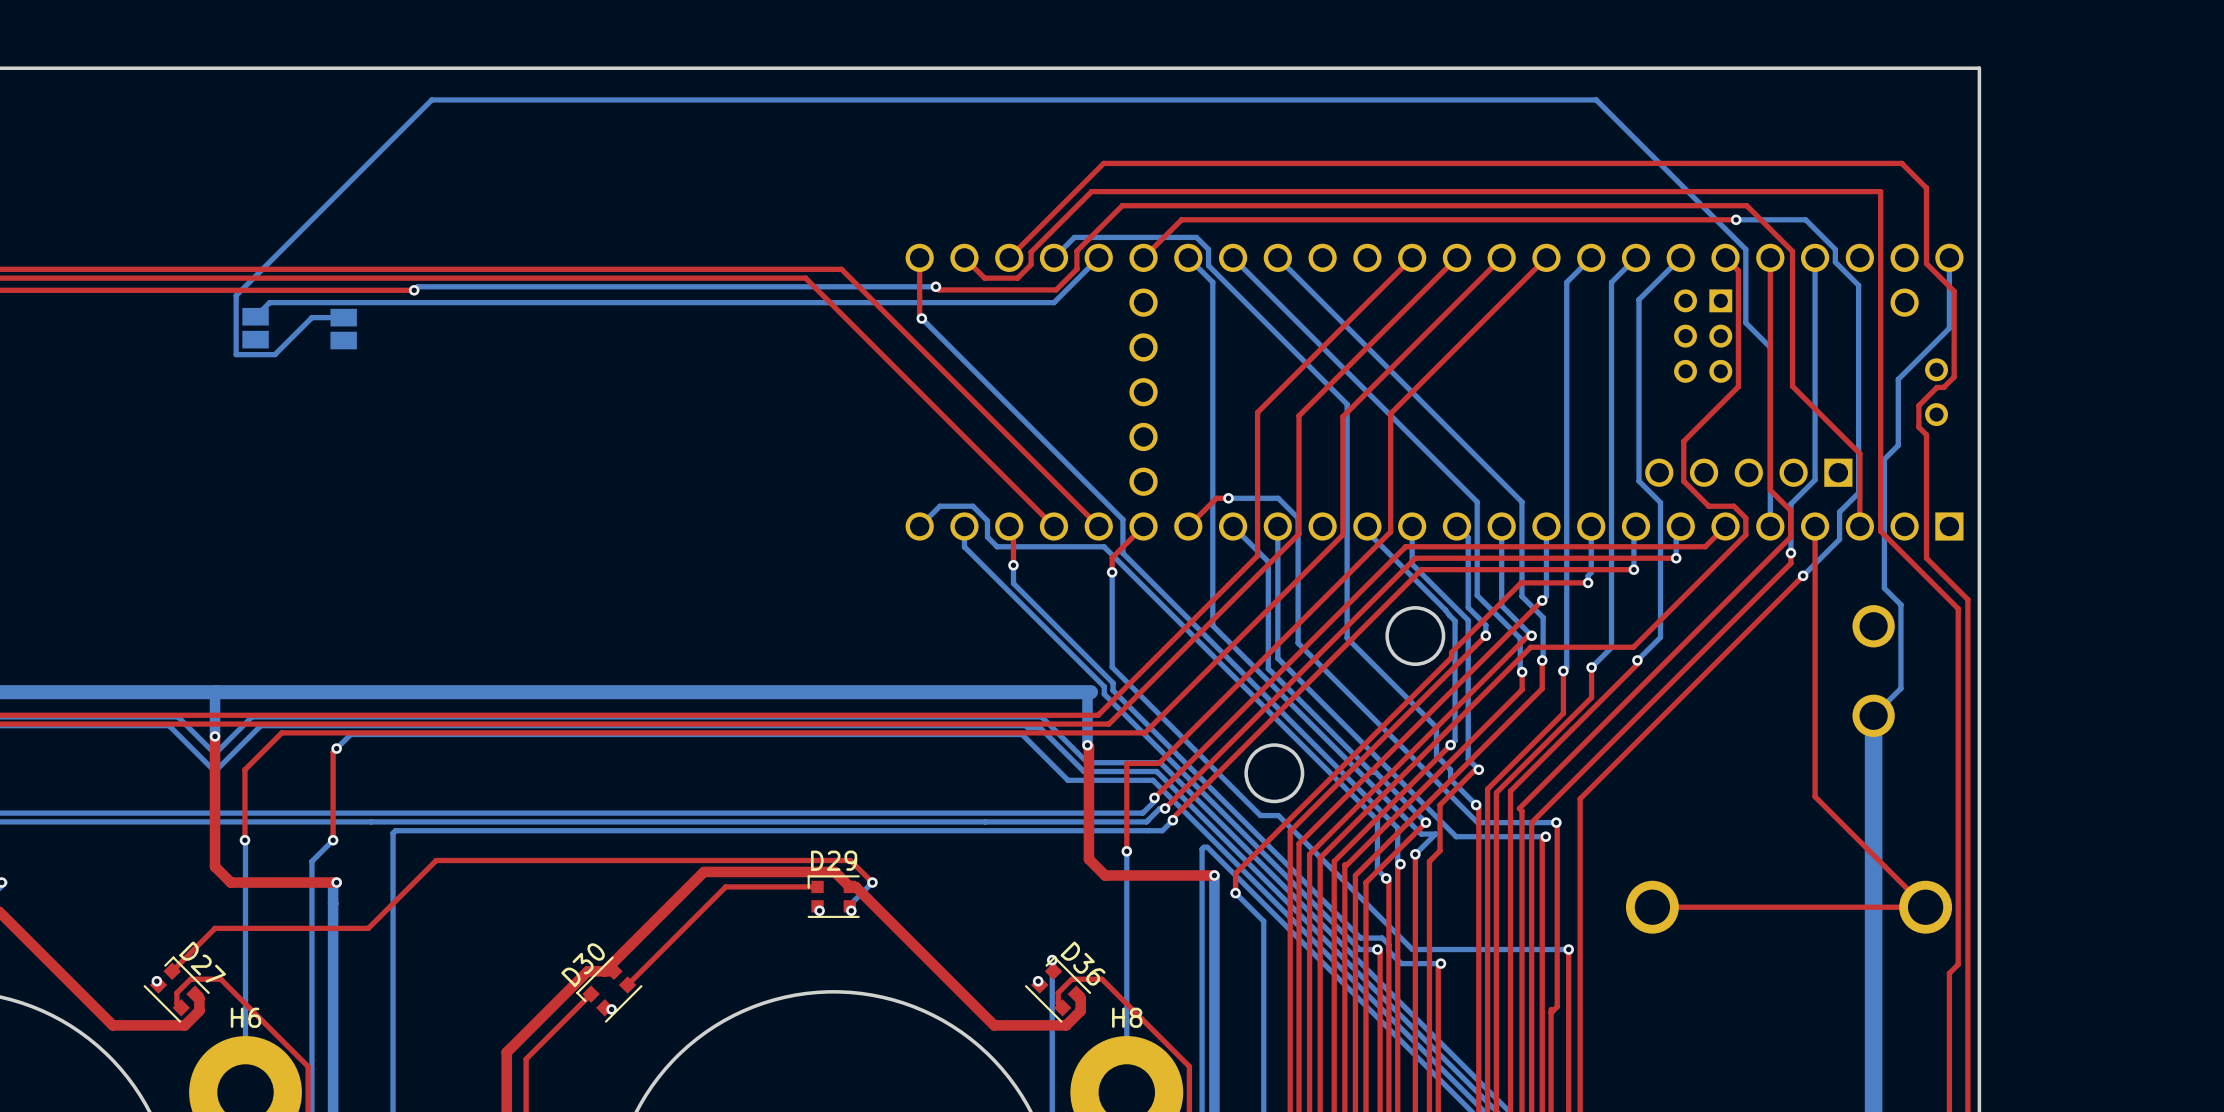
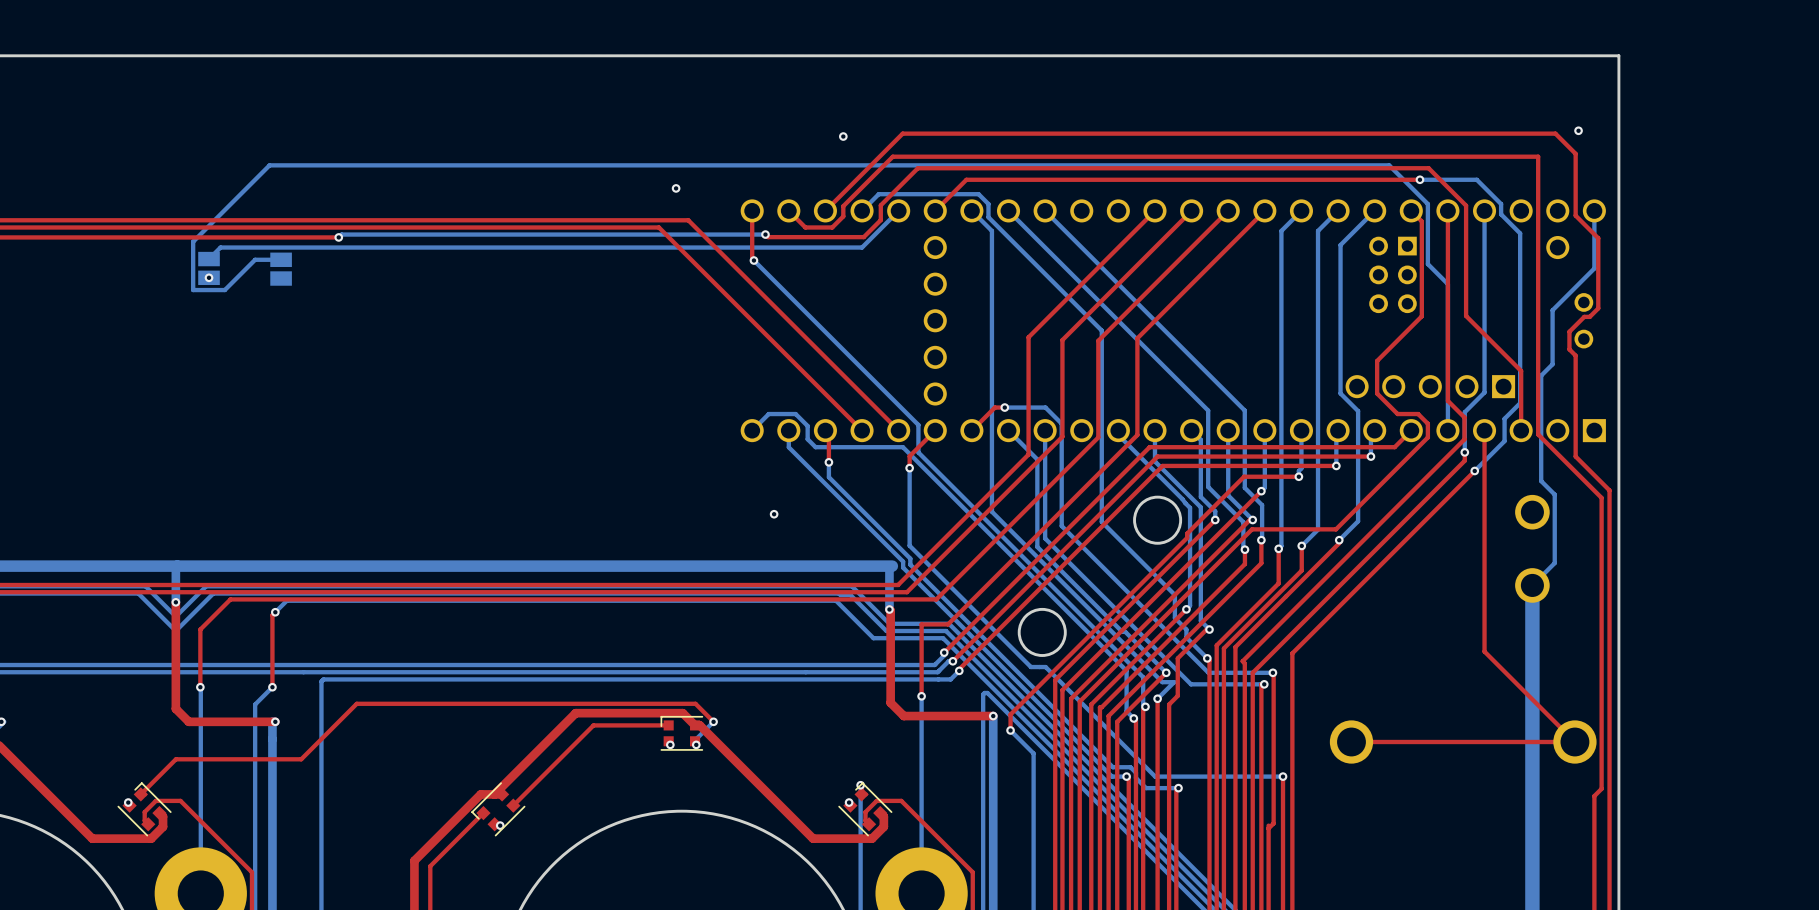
via: none -> (1578, 130)
via: none -> (843, 136)
bottom track: (329, 202) (431, 99) (1596, 99) (1698, 202) -> (269, 165) (1389, 165)
via: none -> (676, 188)
via: none -> (209, 277)
via: none -> (774, 514)
D29 name: D29 (834, 860) -> none
D27 name: D27 (202, 962) -> none
D36 name: D36 (1083, 963) -> none
D30 name: D30 (583, 965) -> none
H6 name: H6 (245, 1017) -> none
H8 name: H8 (1127, 1017) -> none

